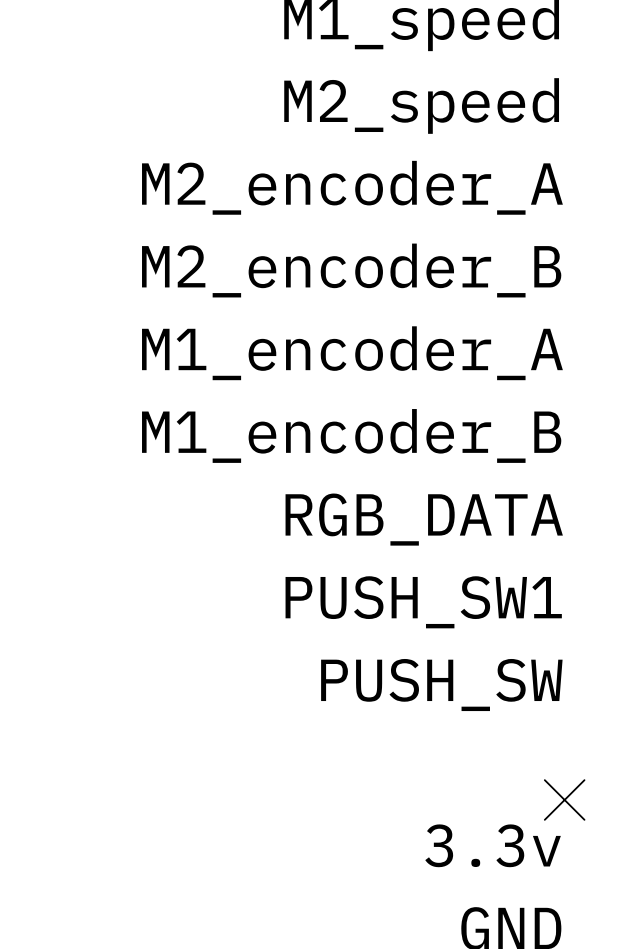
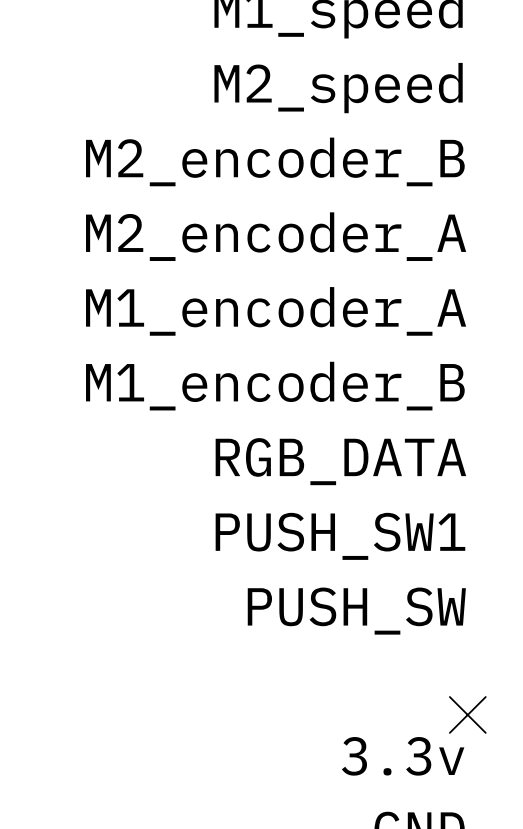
label: M2_encoder_A (352, 187) -> M2_encoder_B (275, 161)
label: M2_encoder_B (351, 270) -> M2_encoder_A (276, 236)

